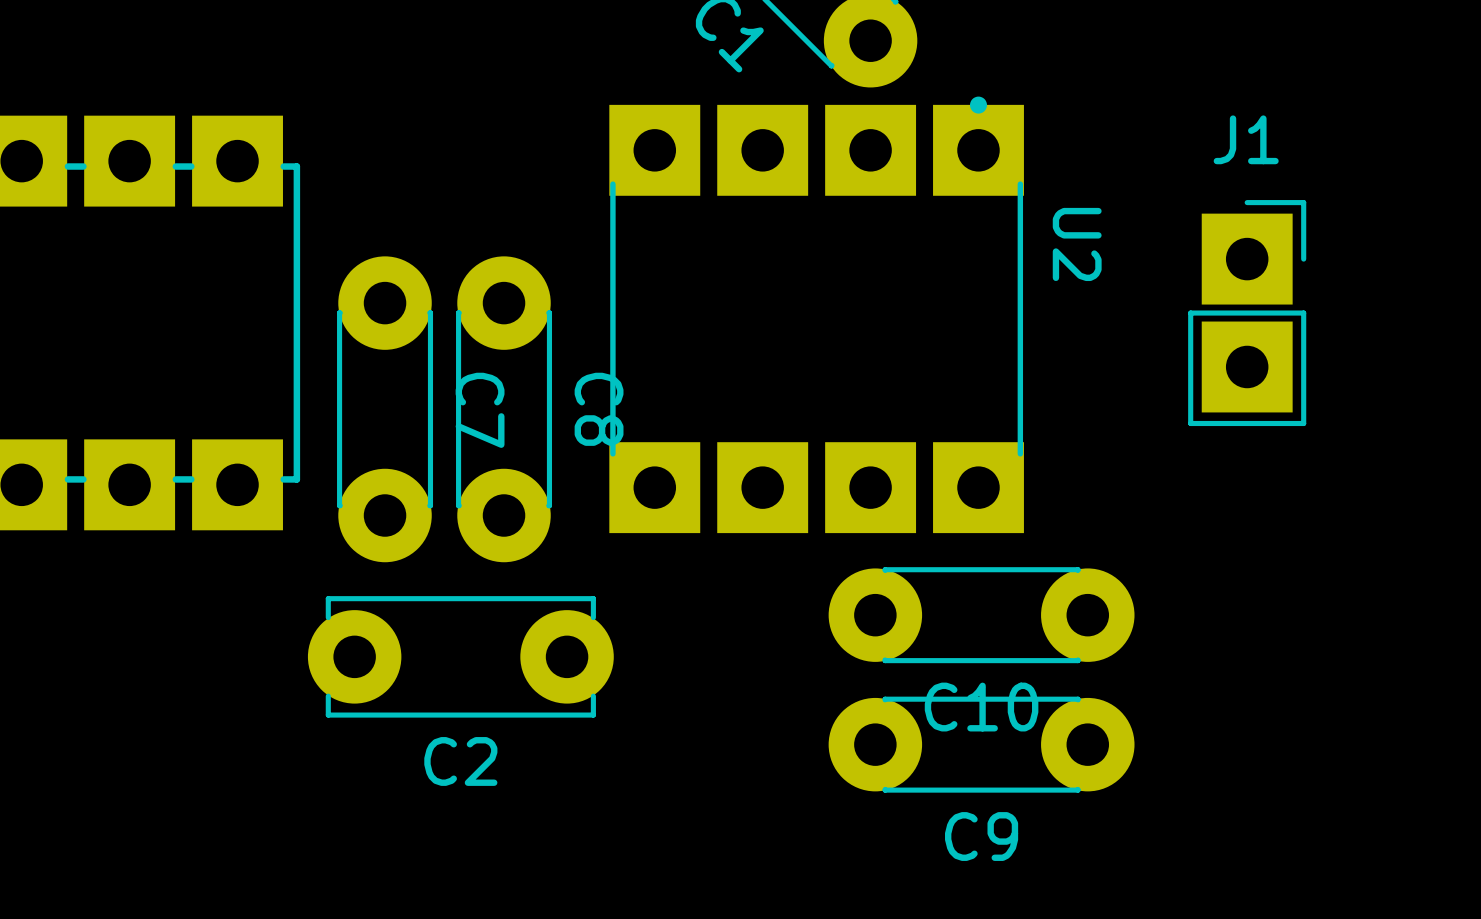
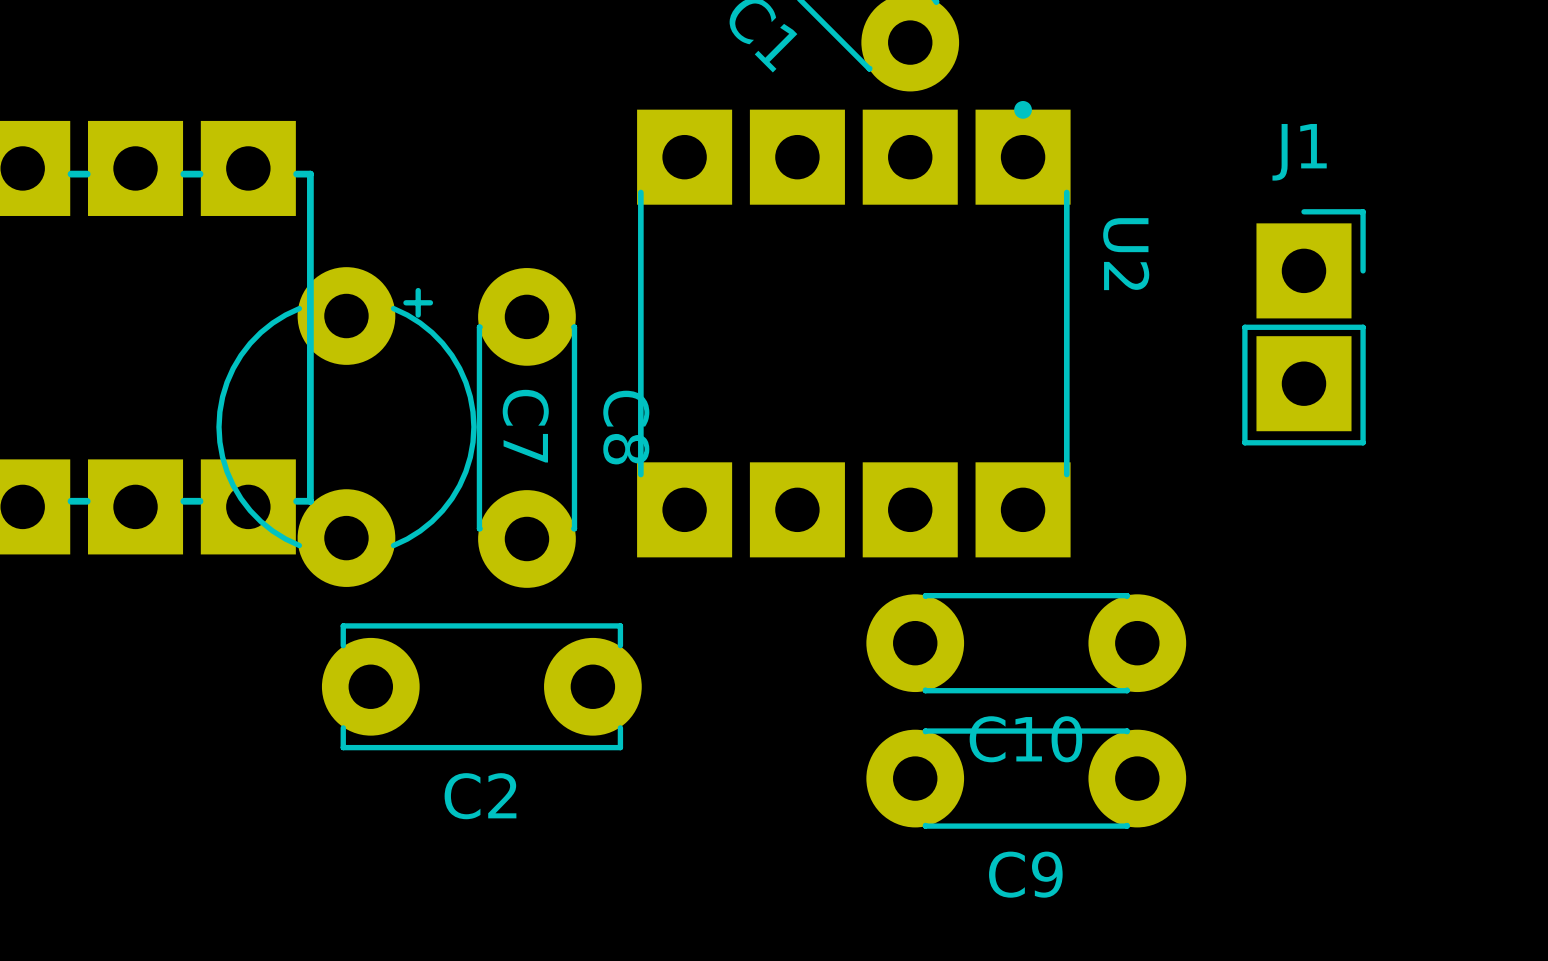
C7 footprint: [337, 256, 434, 563] -> [216, 267, 477, 587]

